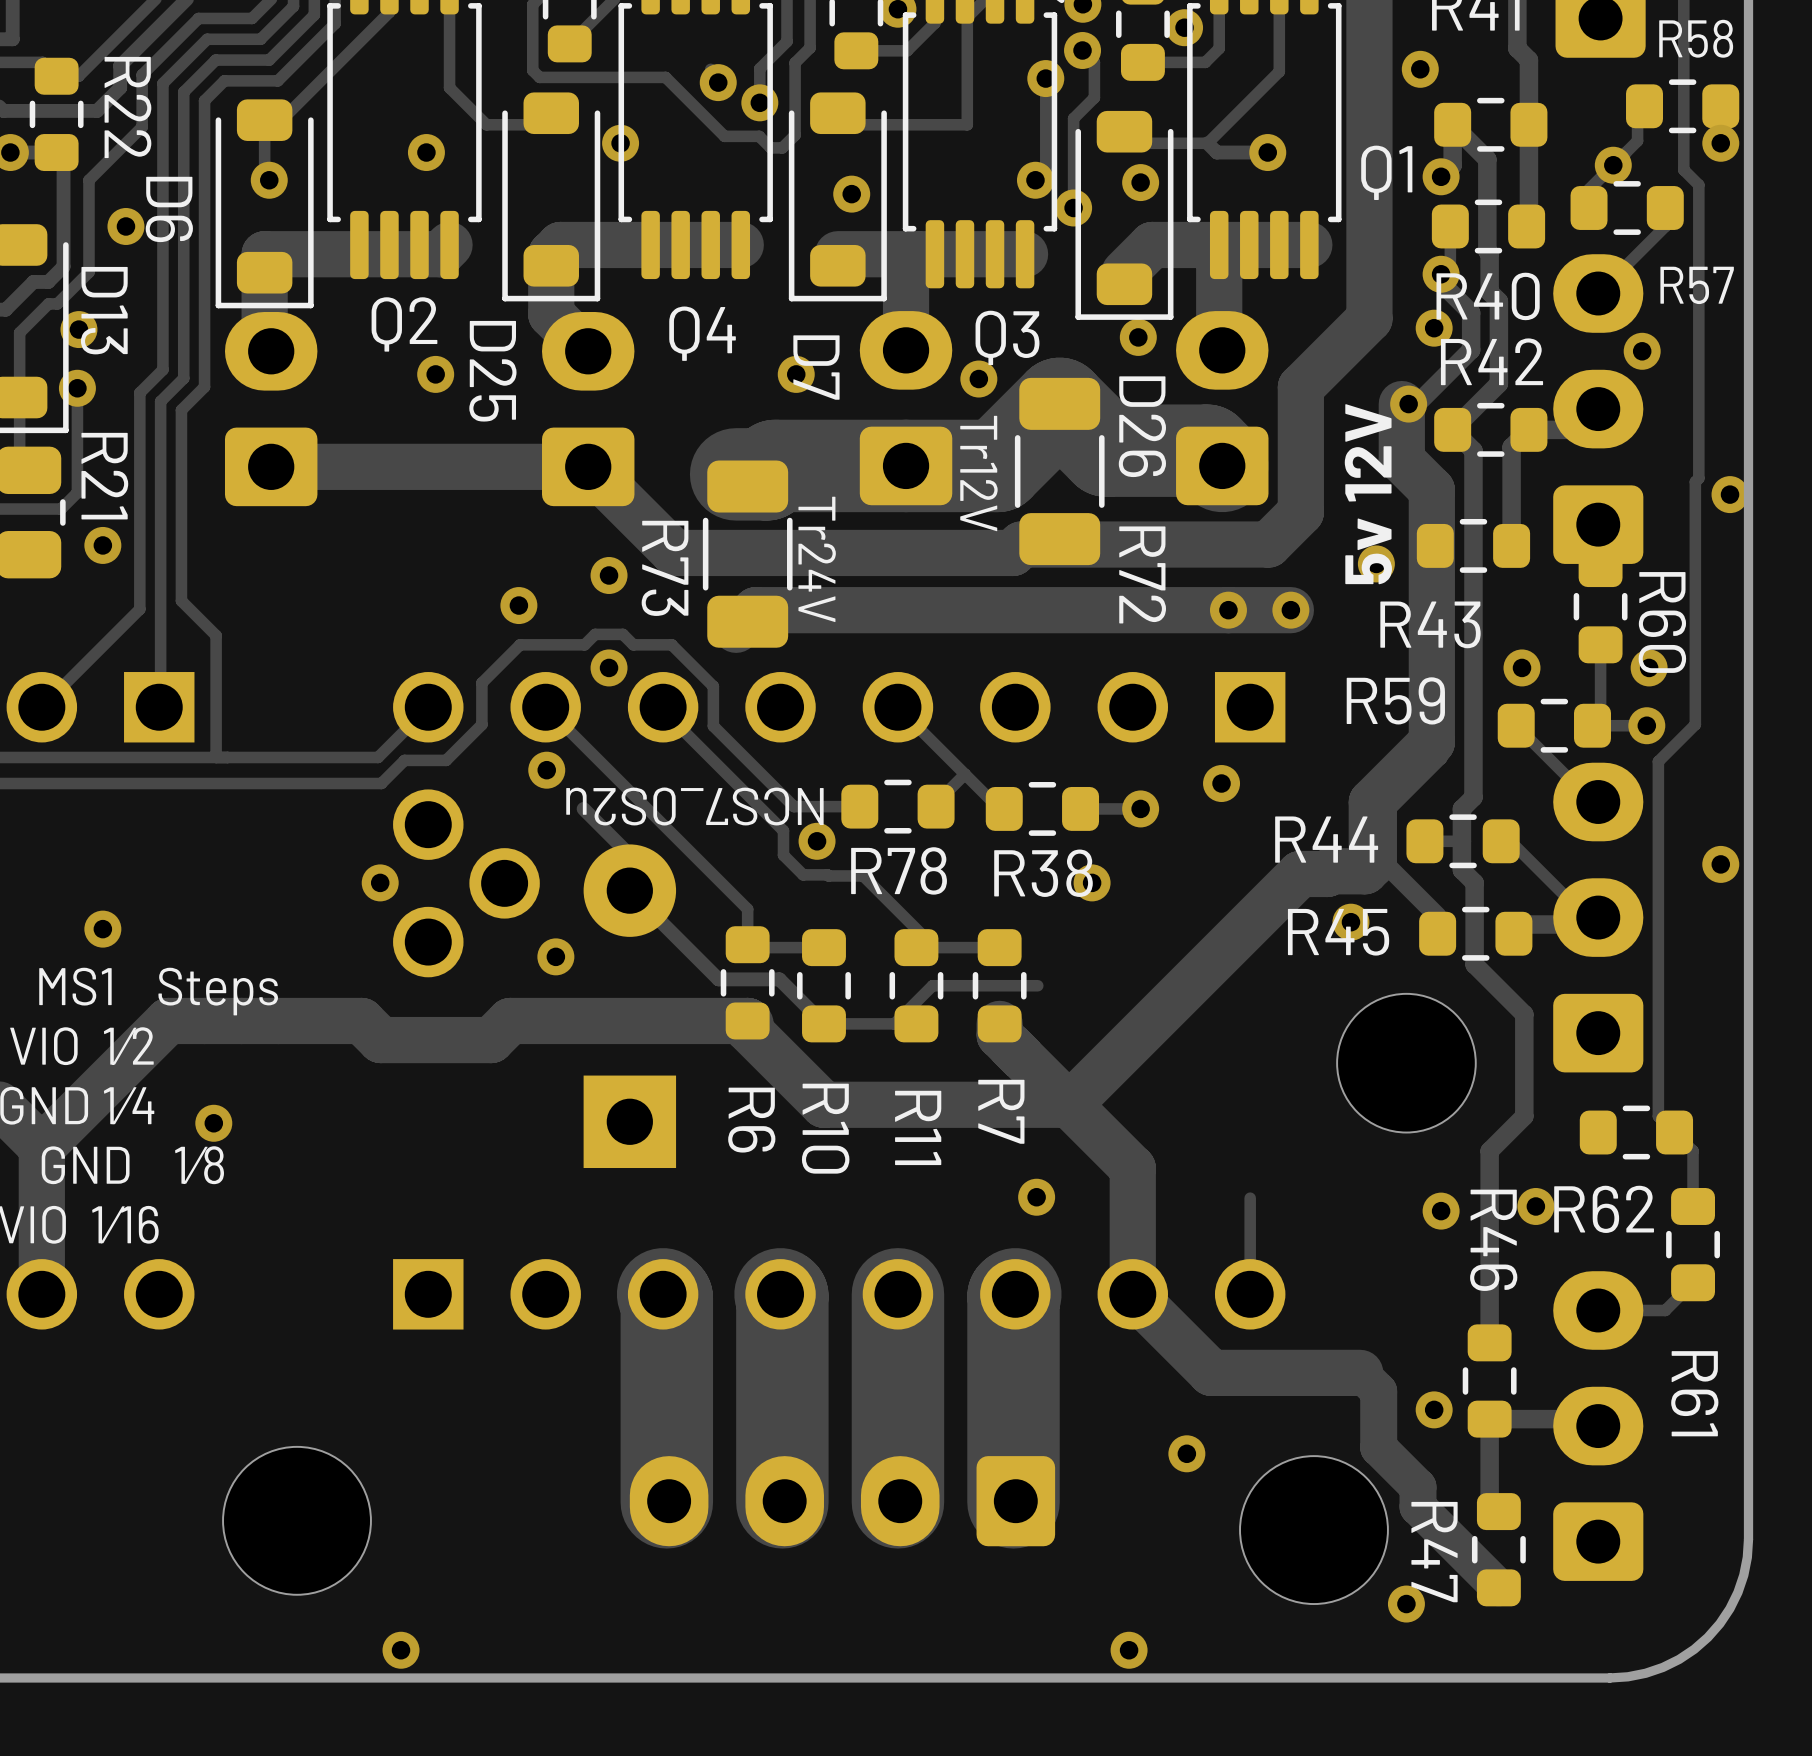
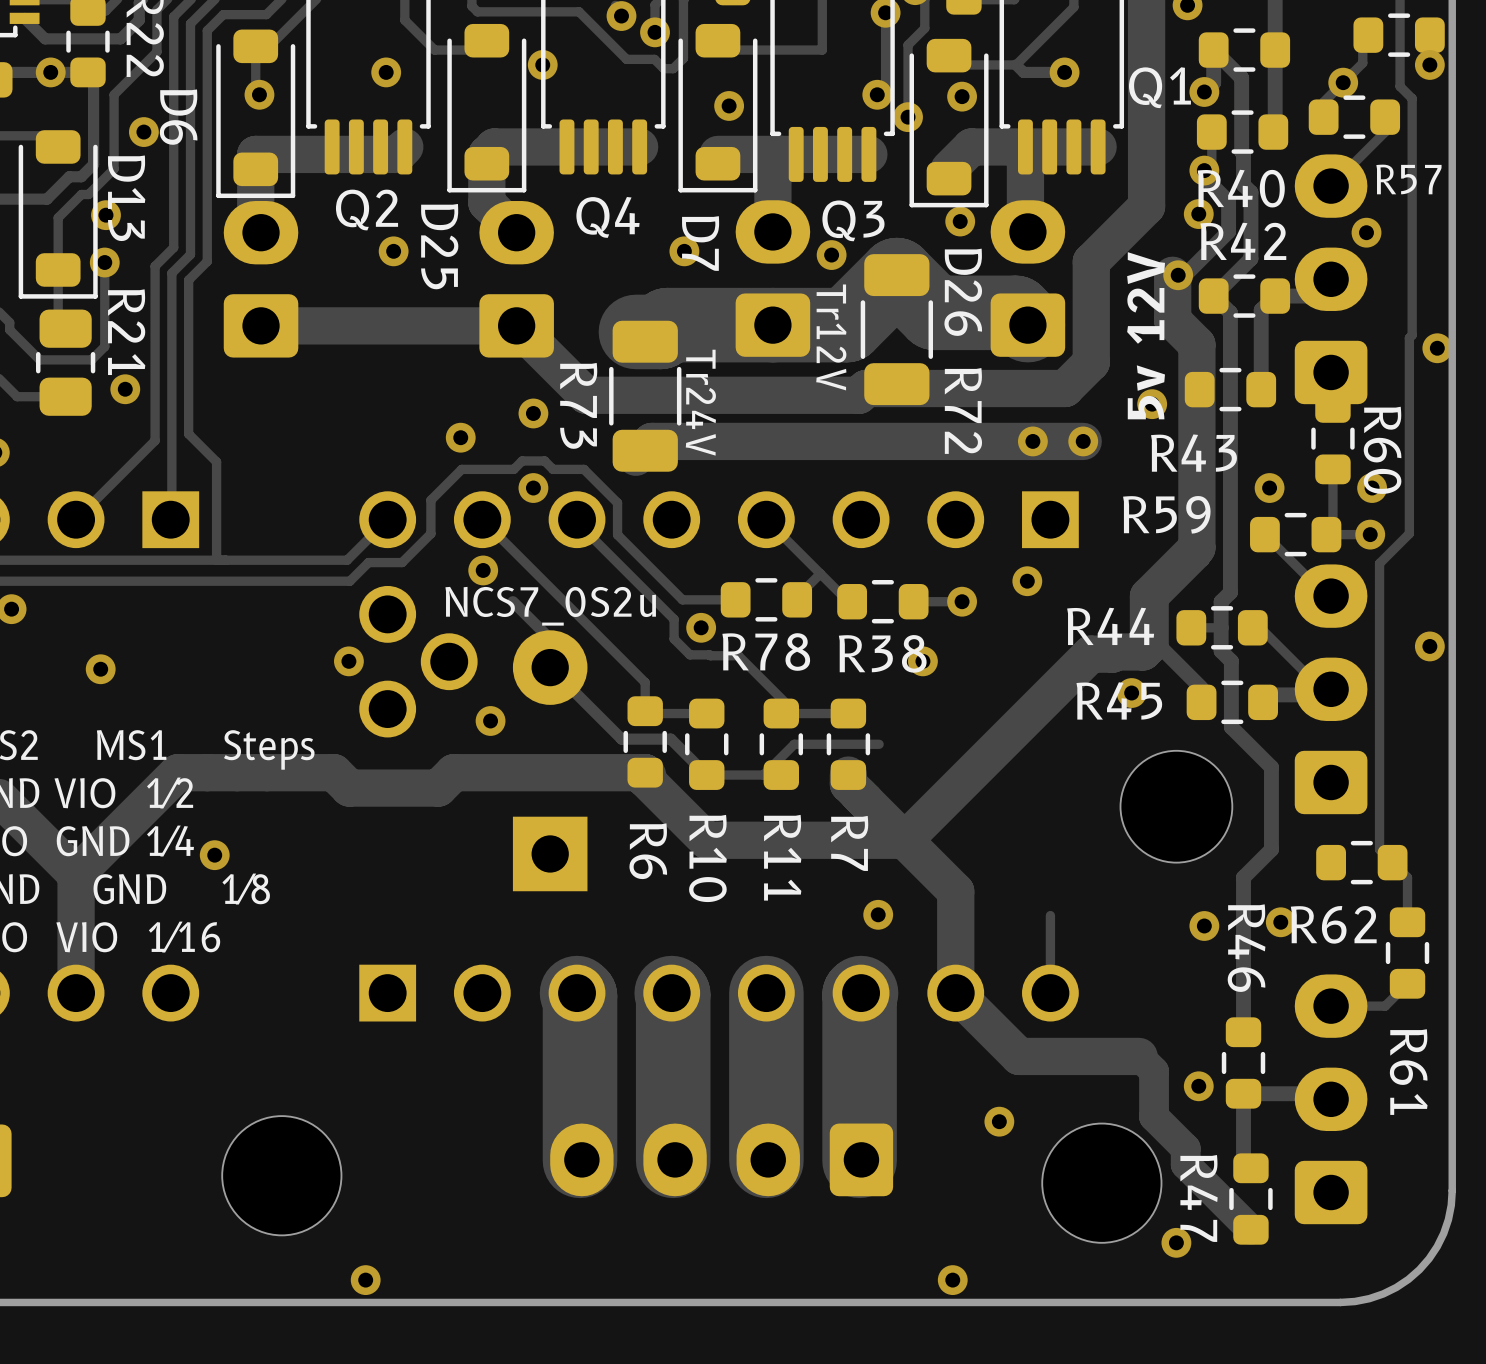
text rotation: 0° (694, 806) -> 180° (550, 606)
via position: (102, 929) -> (100, 669)

